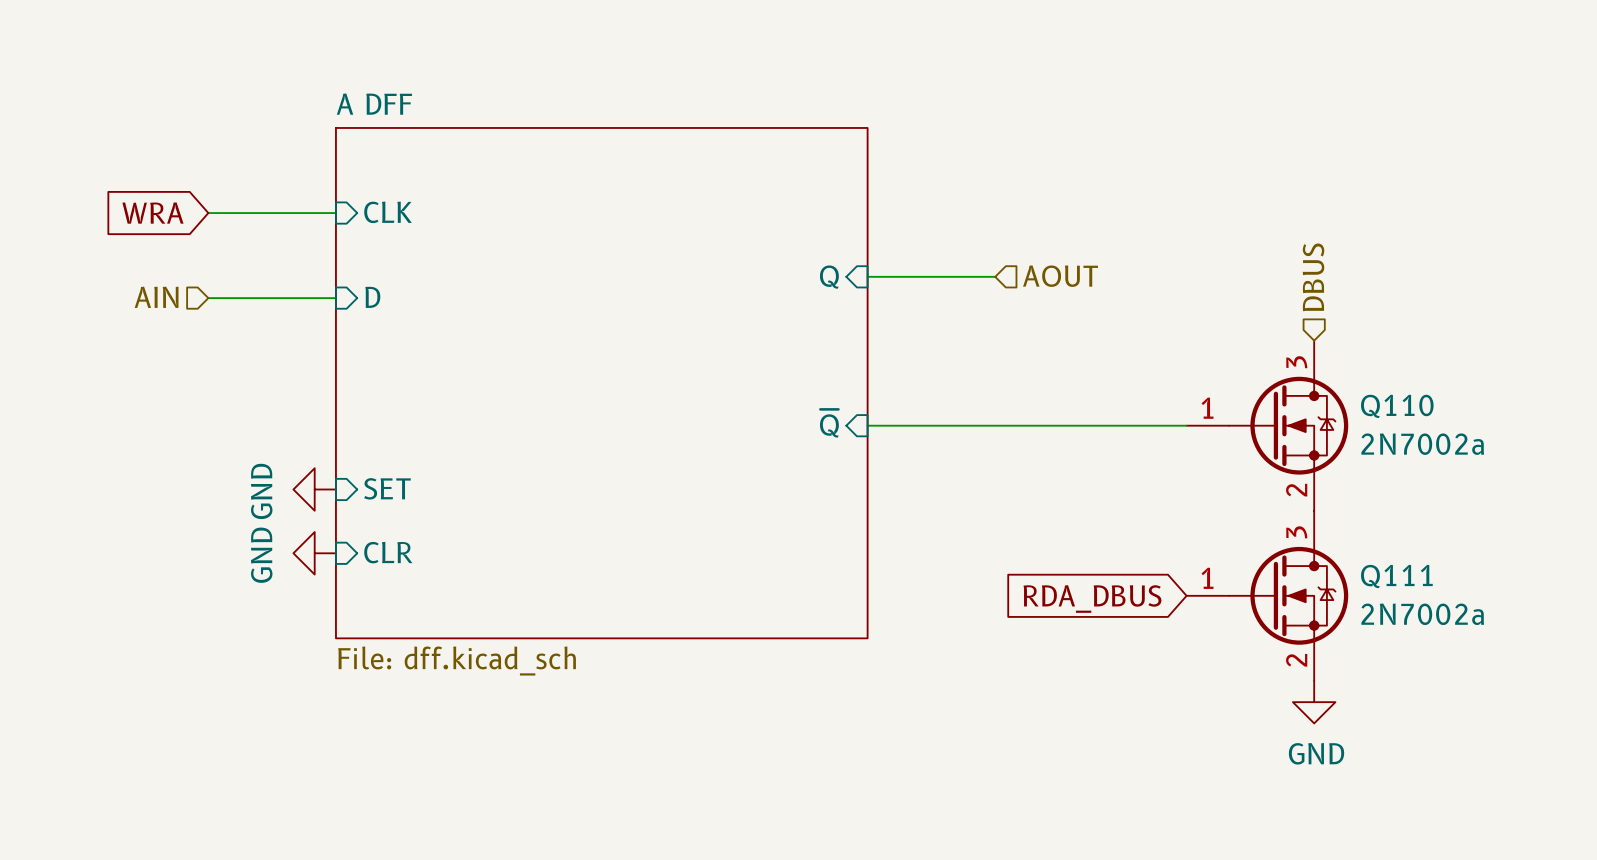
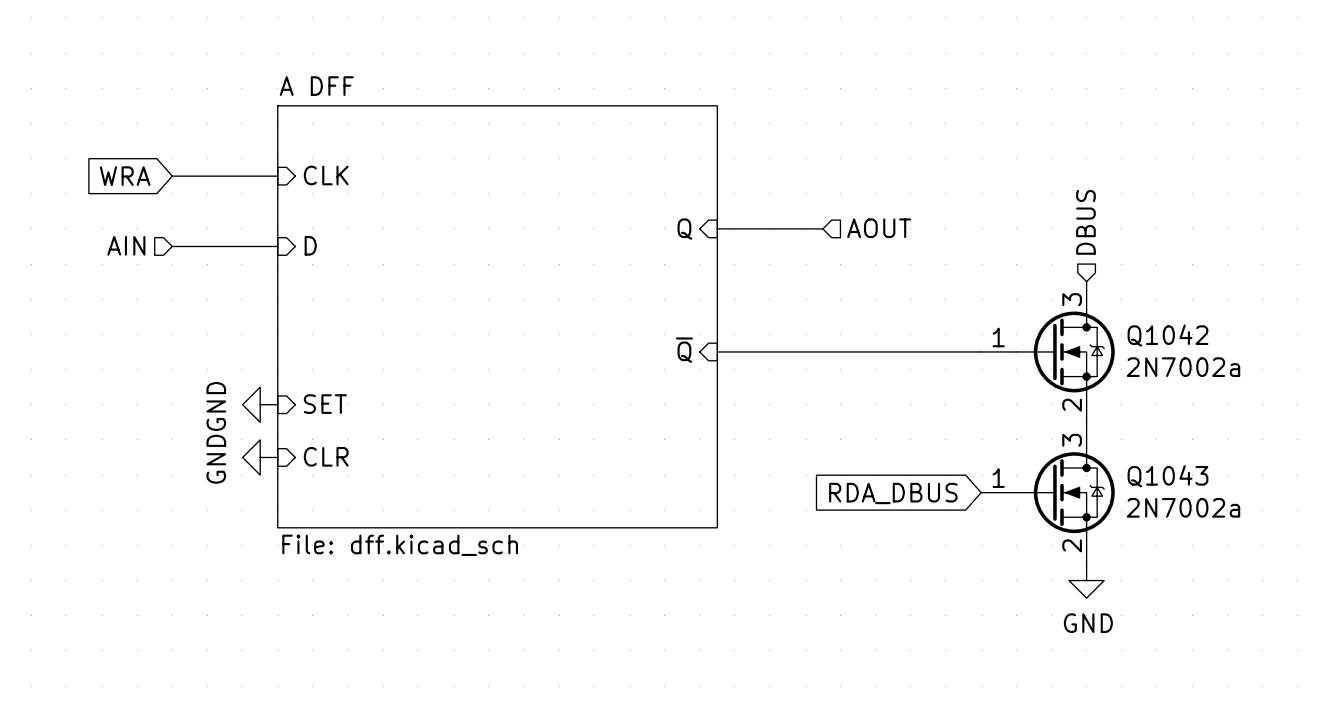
Q110 name: Q110 (1397, 406) -> Q1042 (1167, 335)
Q111 name: Q111 (1396, 576) -> Q1043 (1167, 476)

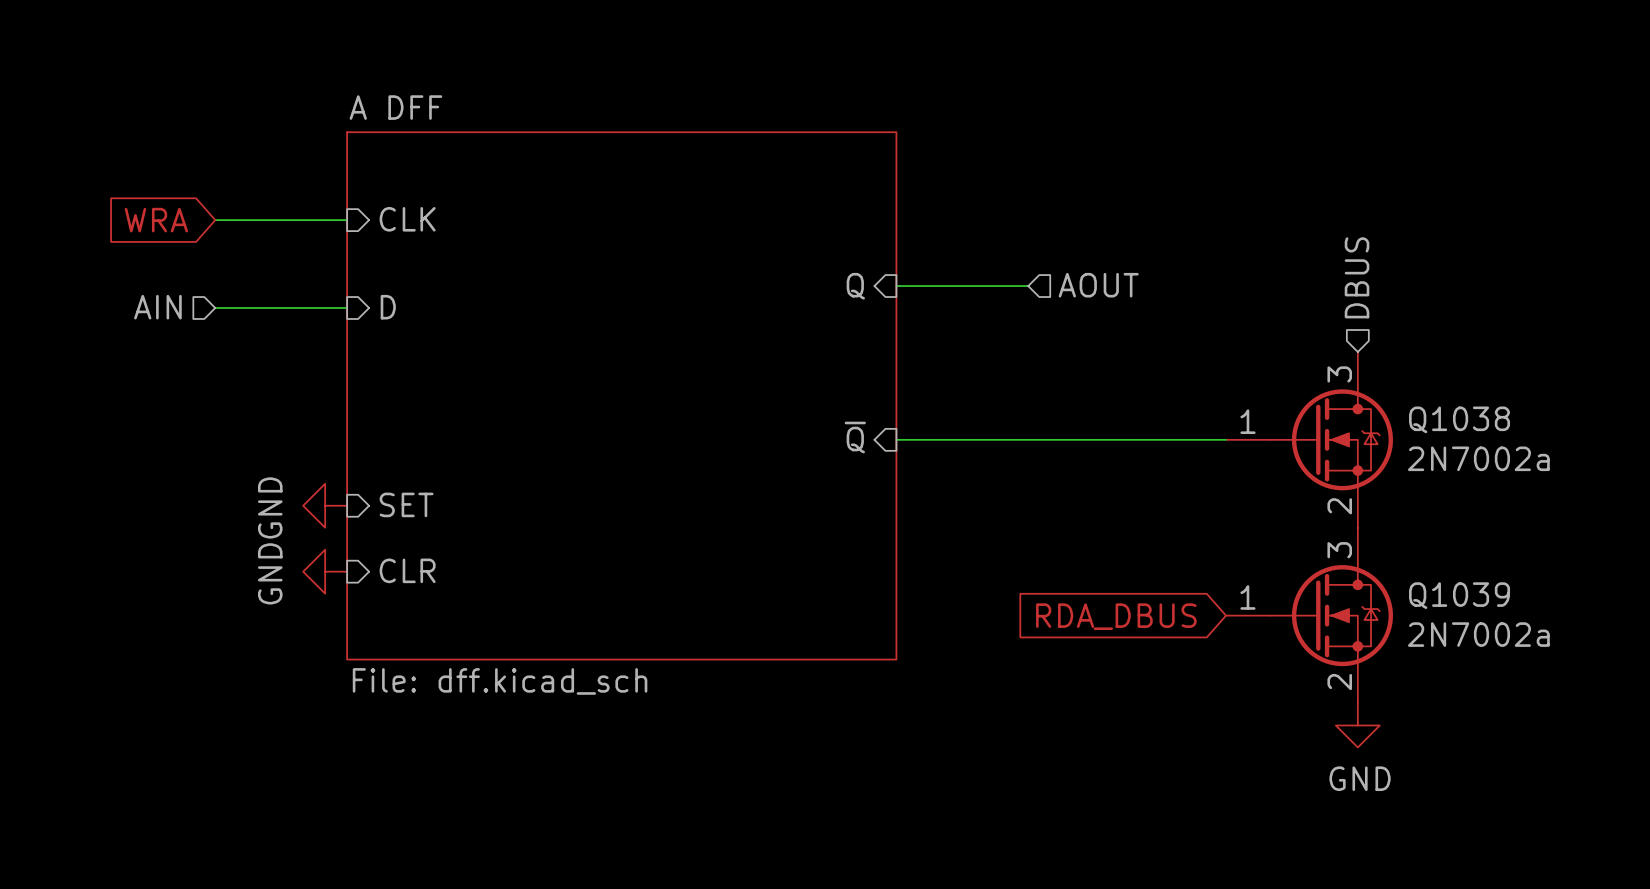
Q1042 name: Q1042 (1167, 335) -> Q1038 (1459, 419)
Q1043 name: Q1043 (1167, 476) -> Q1039 (1459, 595)

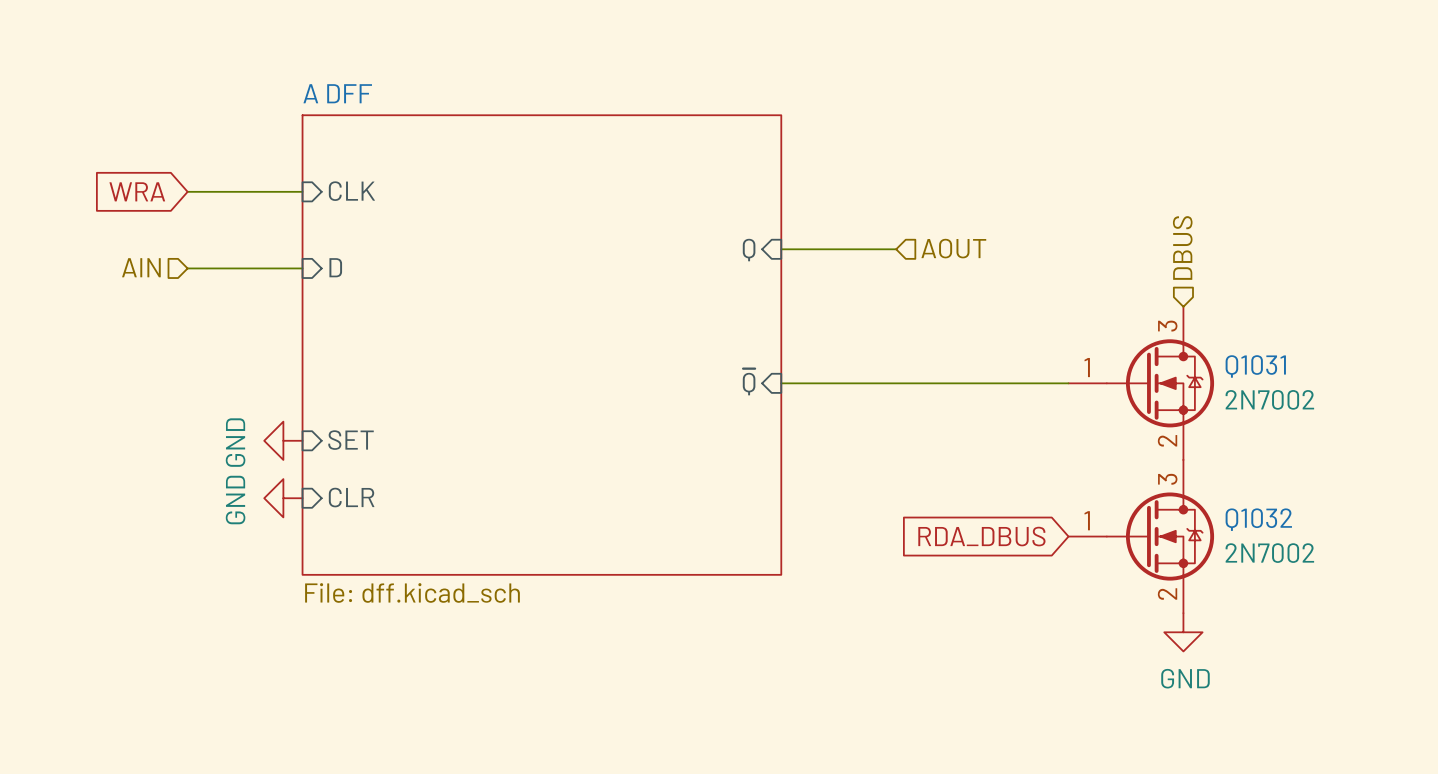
Q1038 name: Q1038 (1459, 419) -> Q1031 (1255, 366)
Q1038 value: 2N7002a (1478, 458) -> 2N7002 (1269, 399)
Q1039 name: Q1039 (1459, 595) -> Q1032 (1258, 519)
Q1039 value: 2N7002a (1478, 634) -> 2N7002 (1269, 553)

